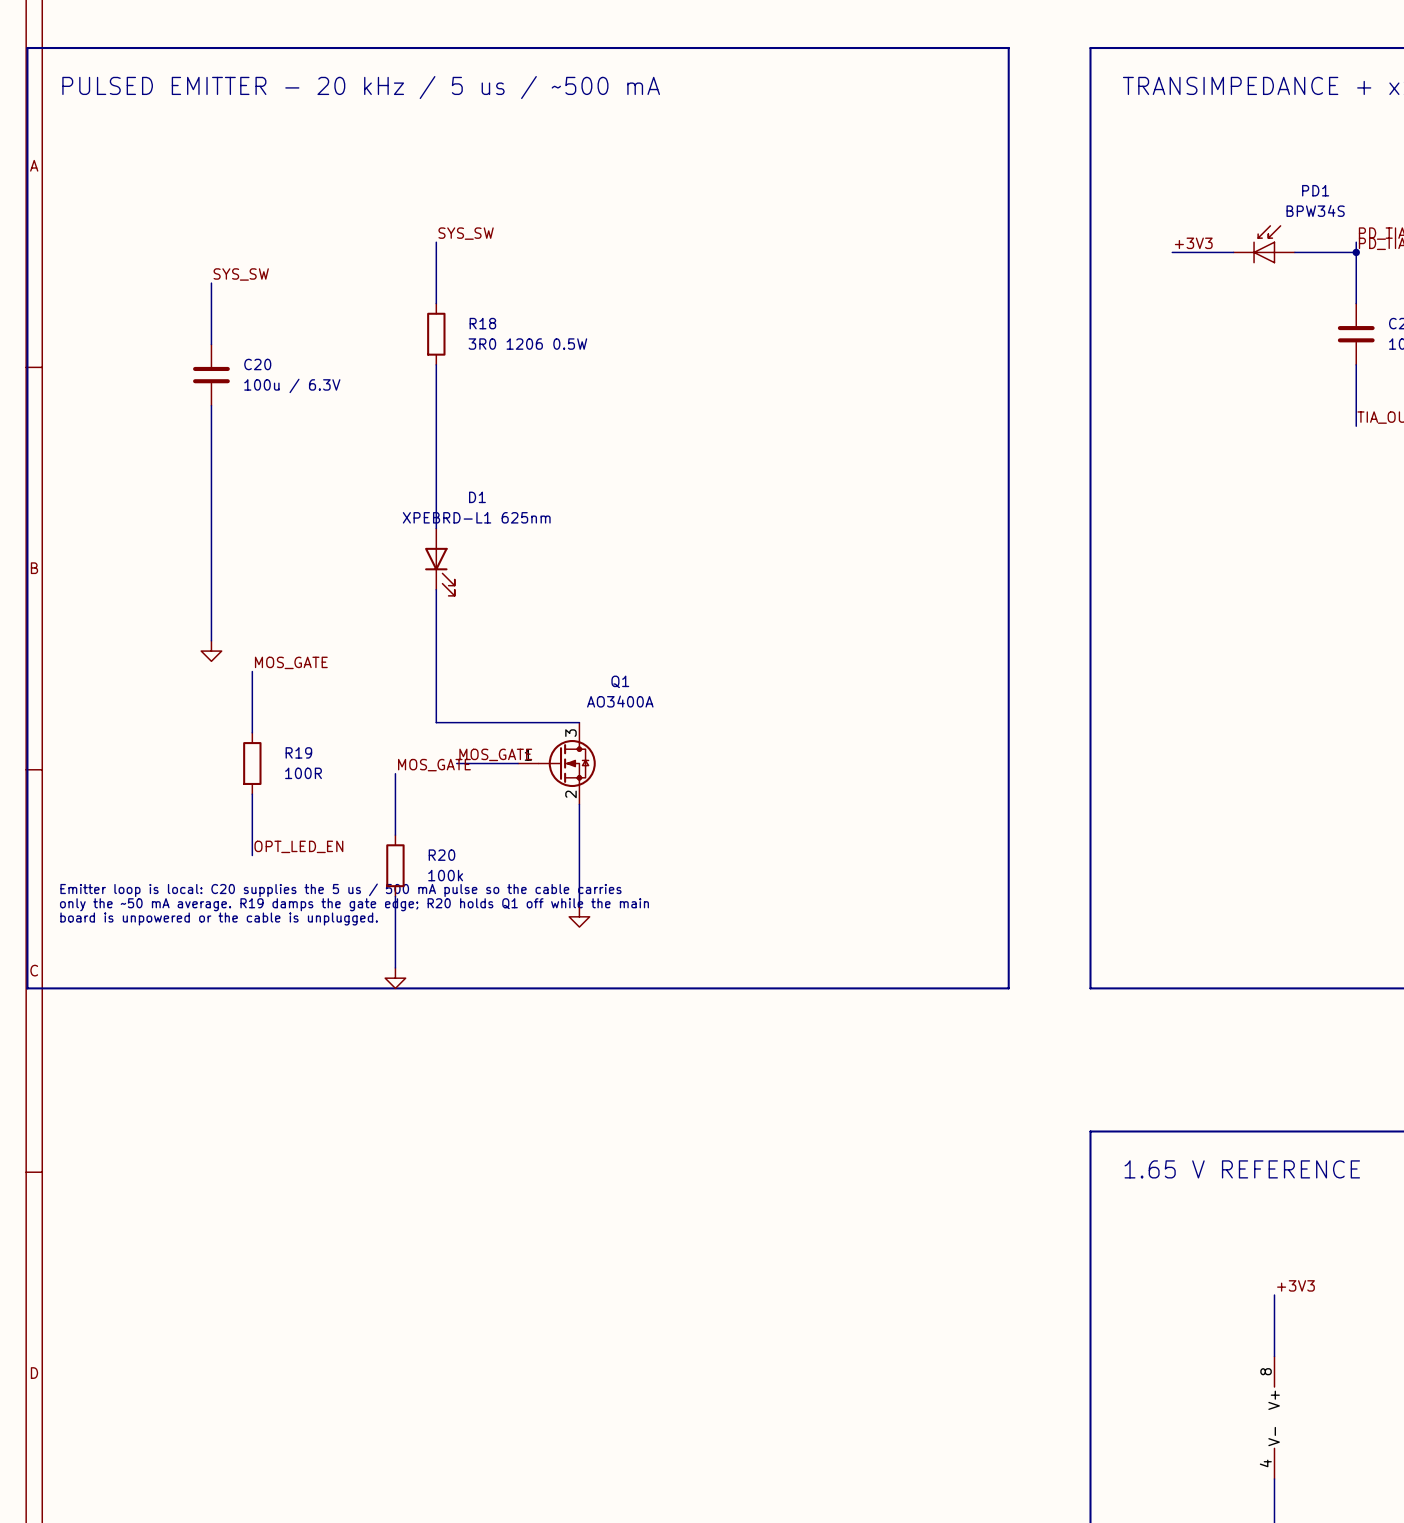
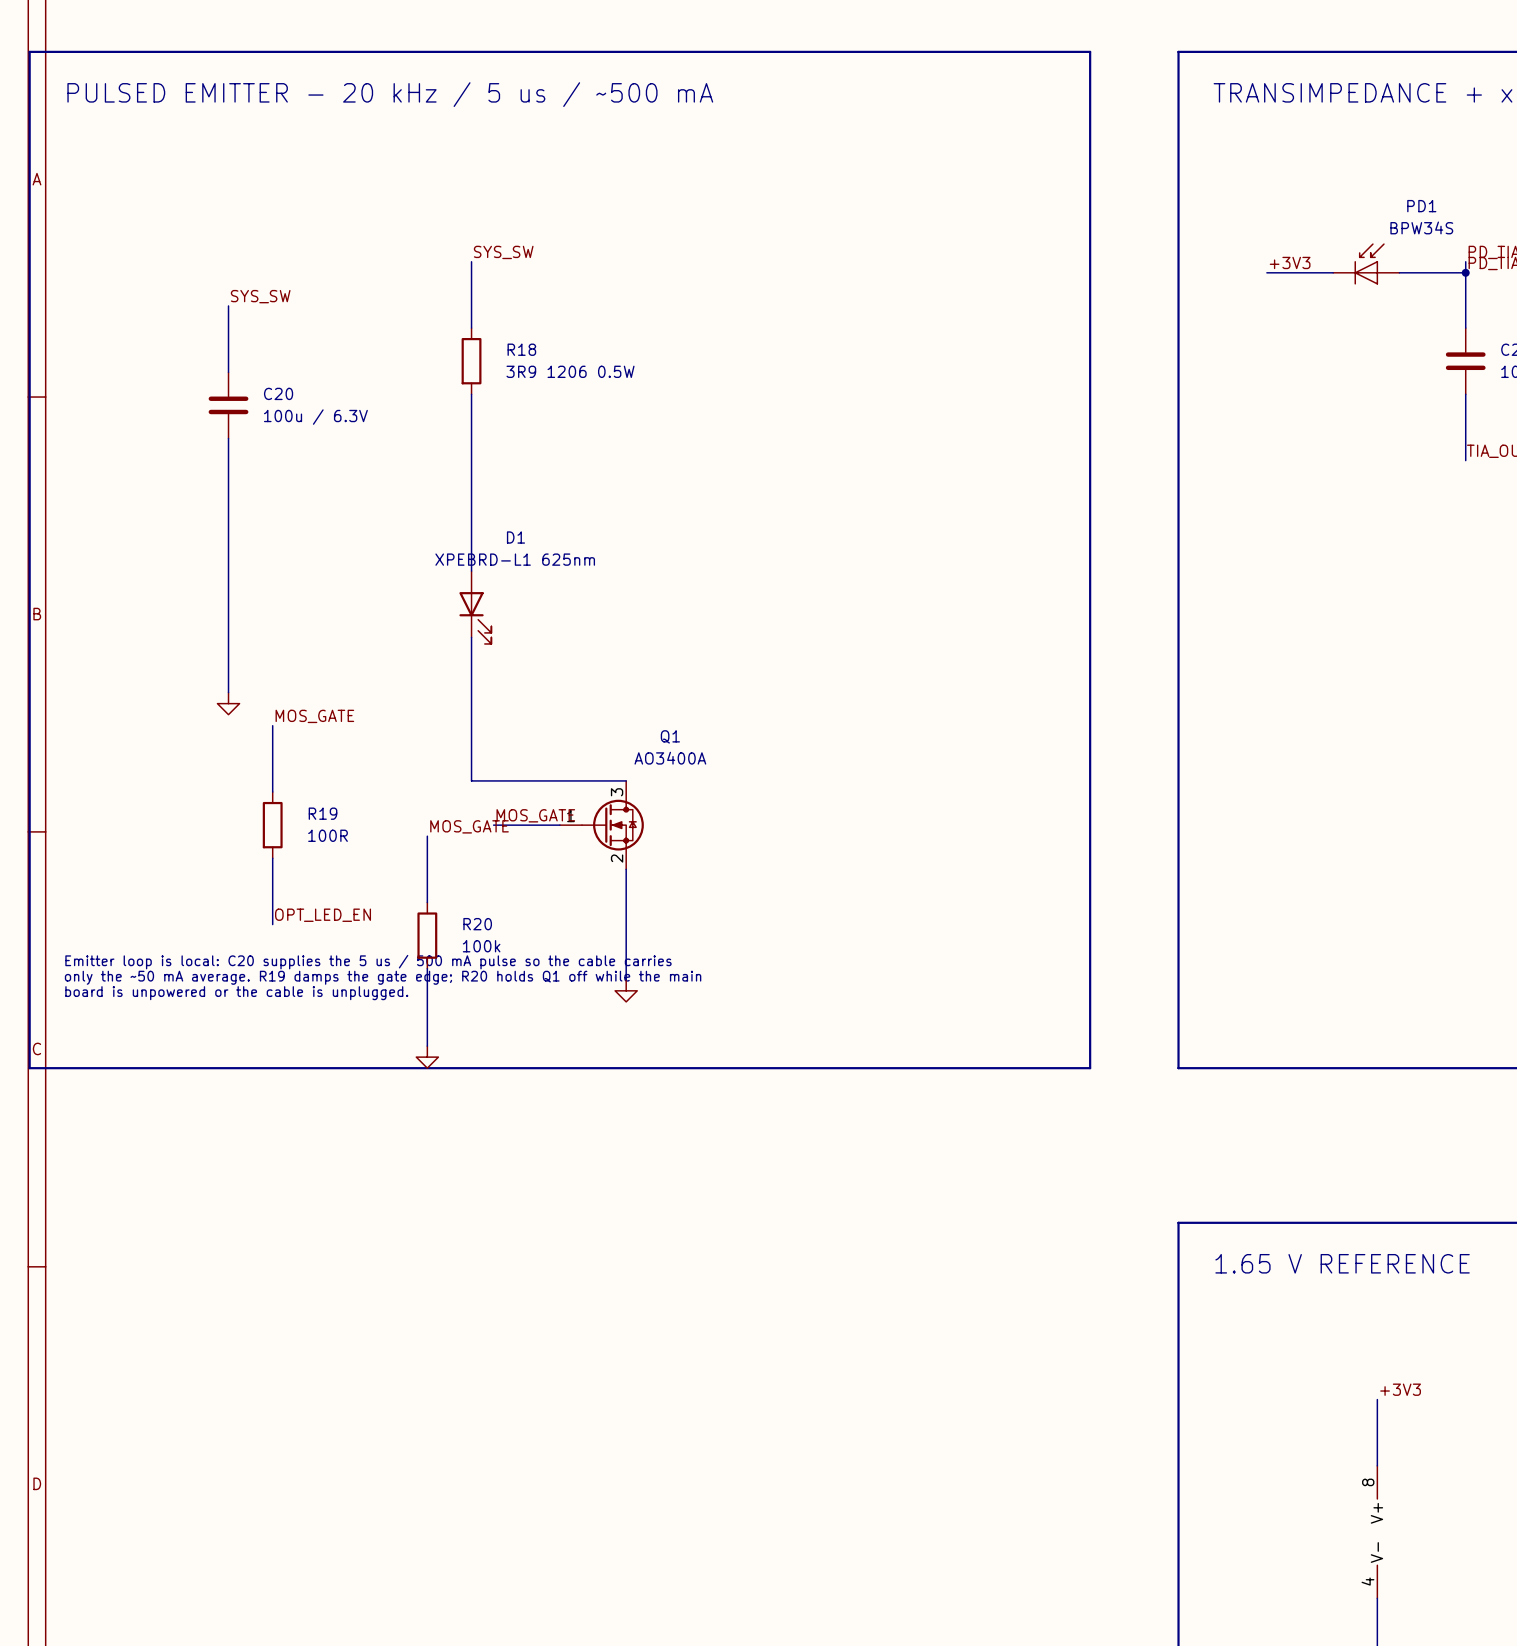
R18 value: 3R0 1206 0.5W (527, 344) -> 3R9 1206 0.5W (570, 371)

